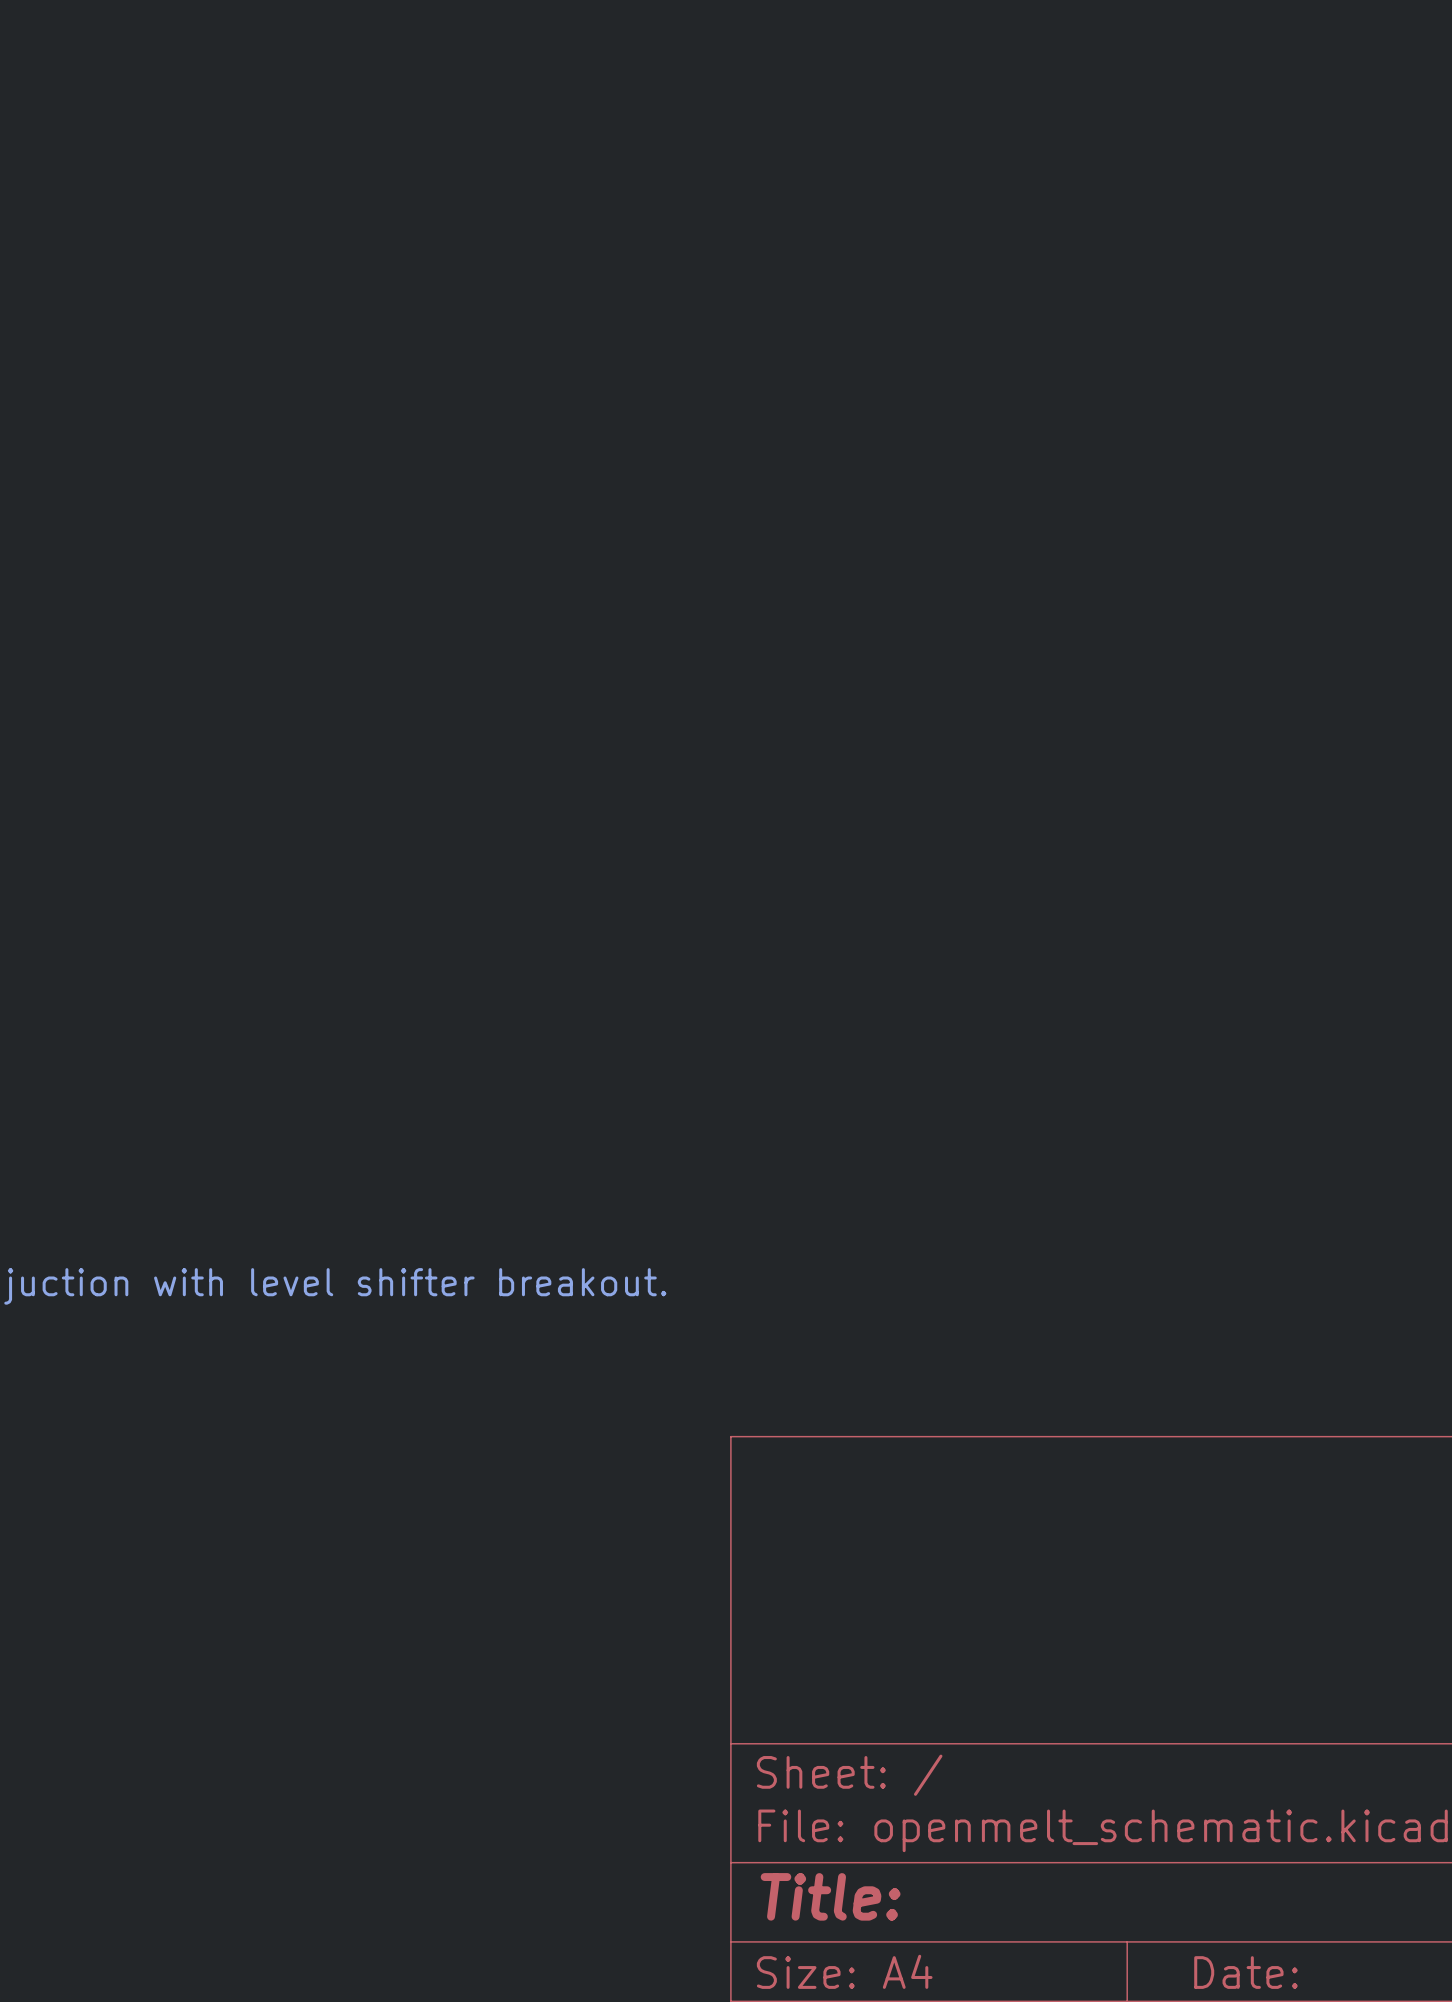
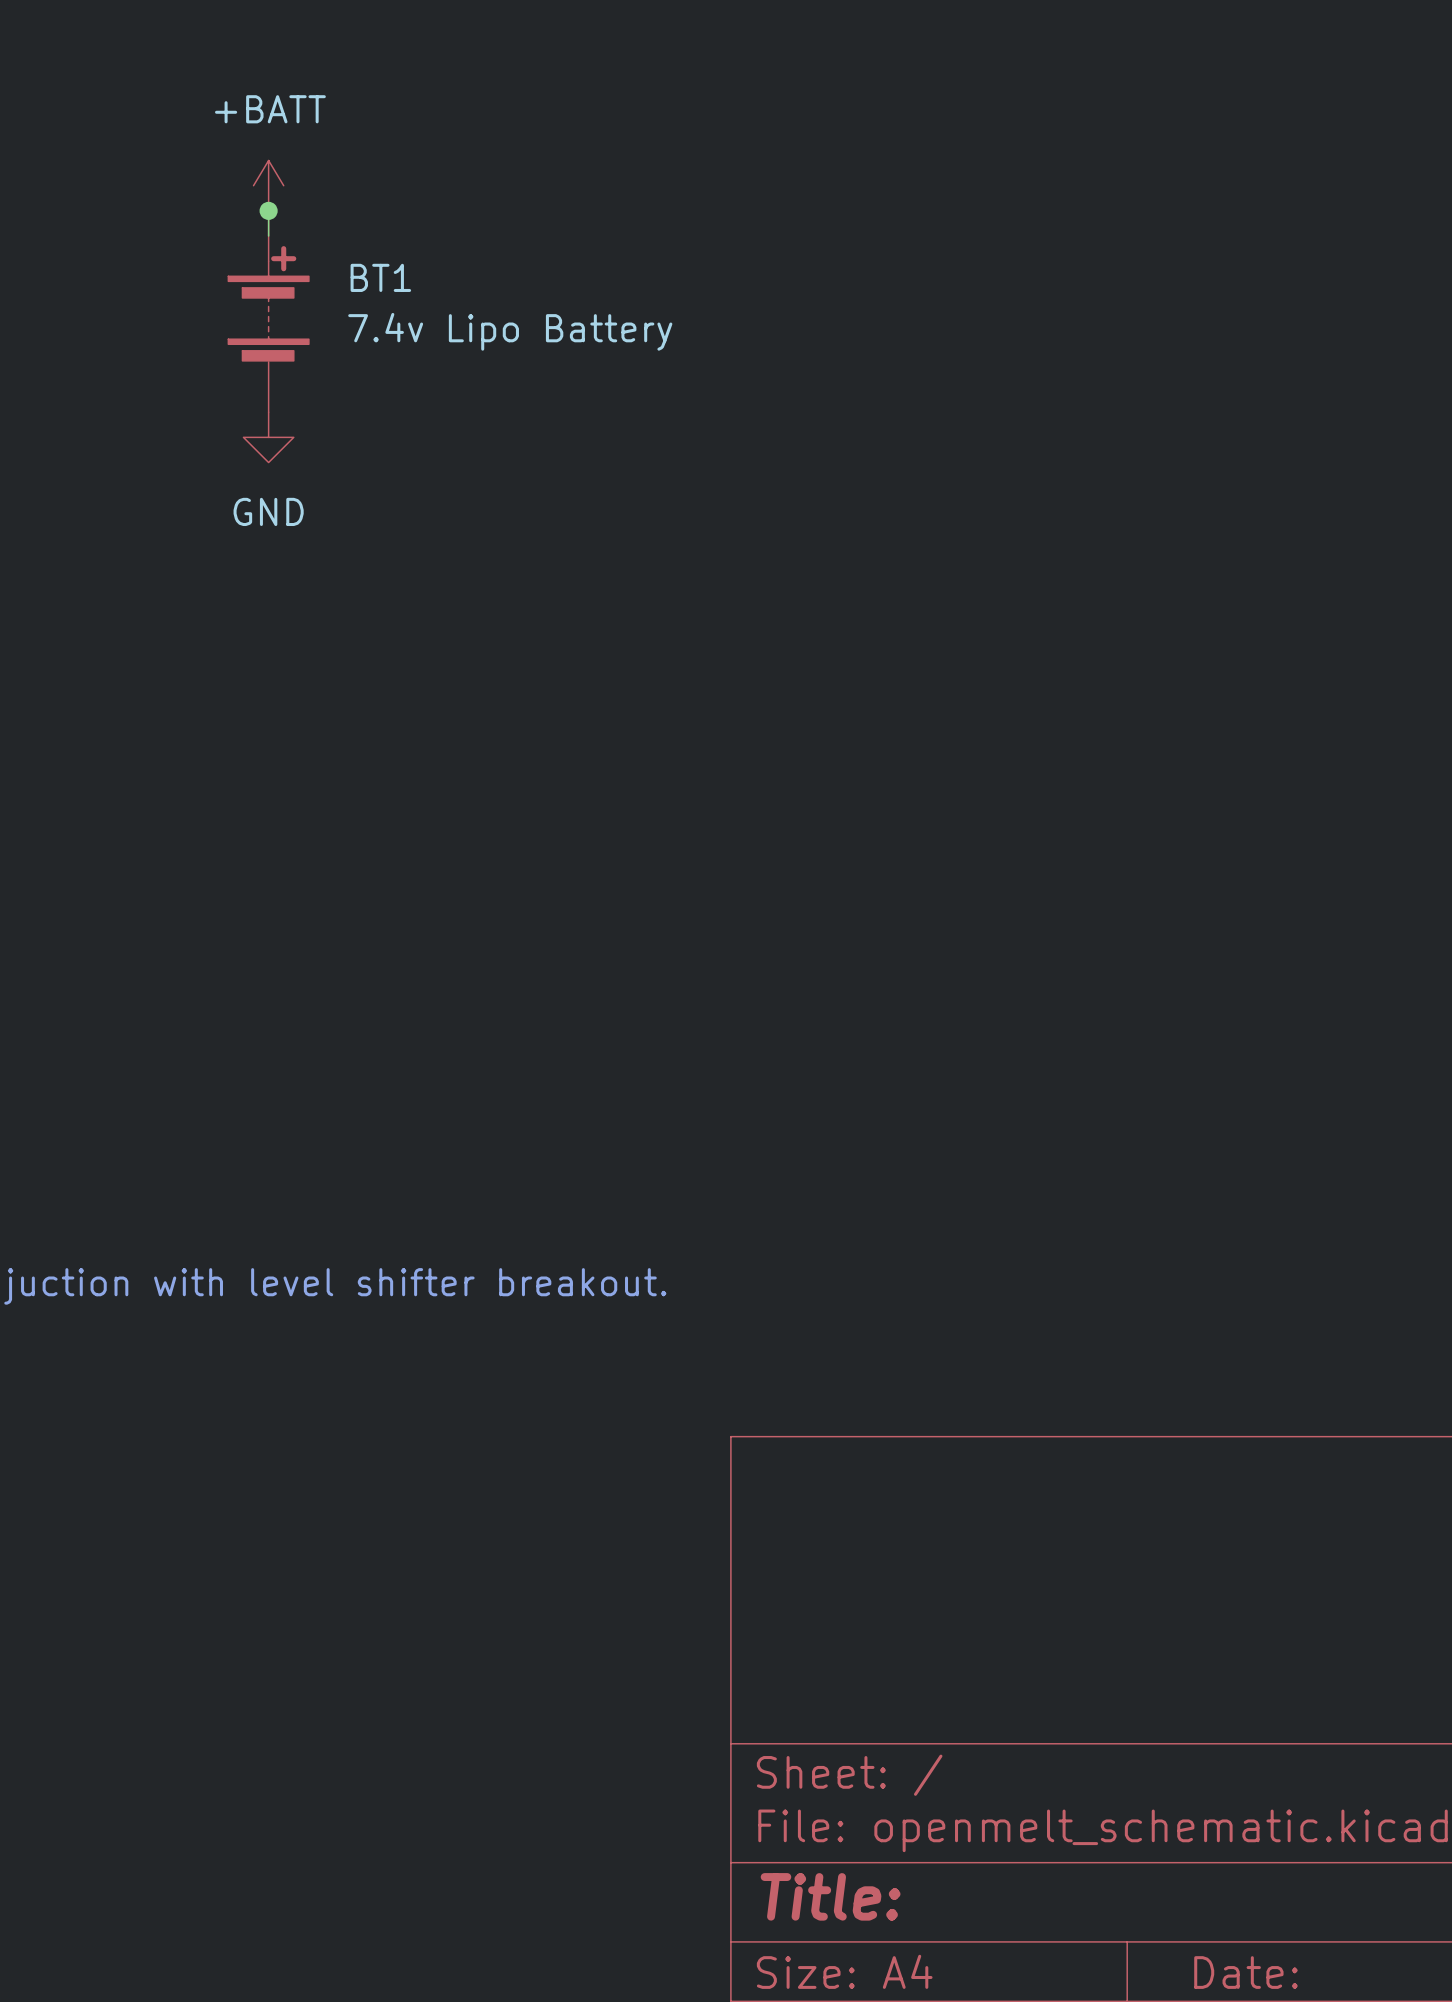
power symbol: none -> +BATT (268, 185)
wire: none -> (268, 210) (268, 236)
junction: none -> (268, 210)
BT1: none -> 7.4v Lipo Battery (268, 311)
power symbol: none -> GND (268, 437)

